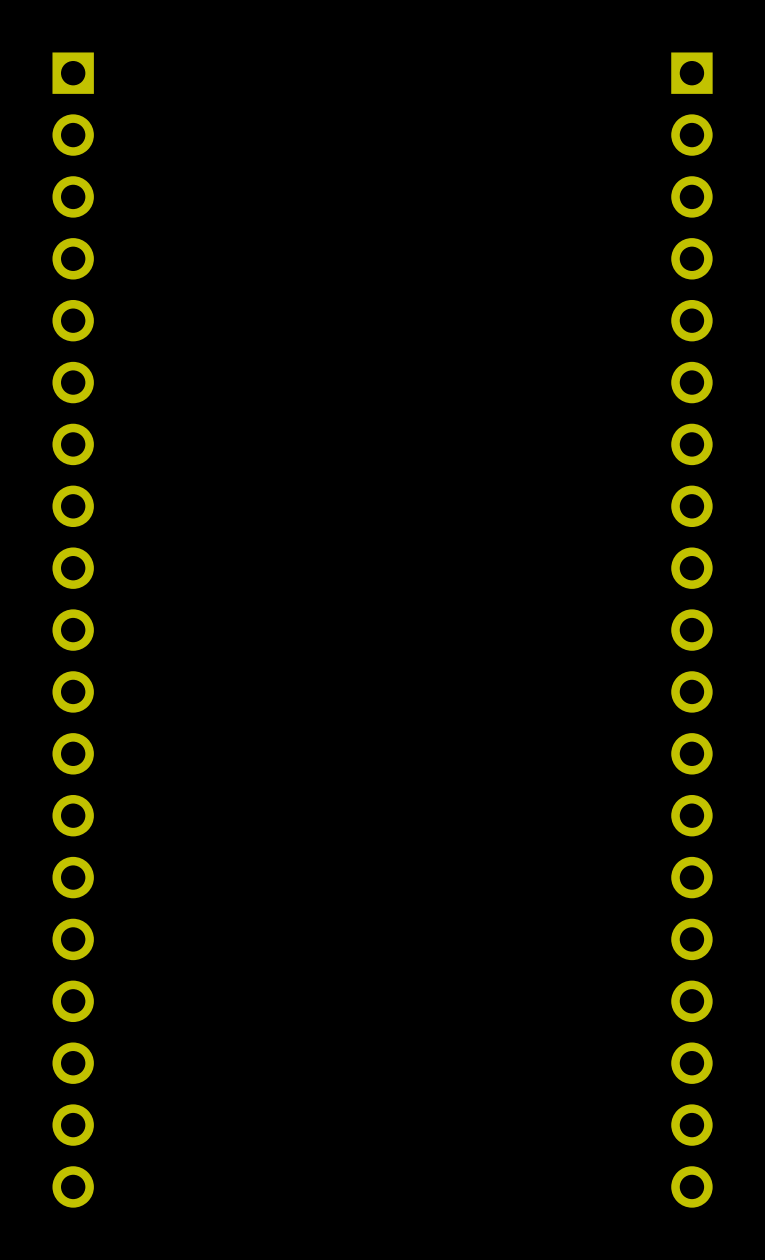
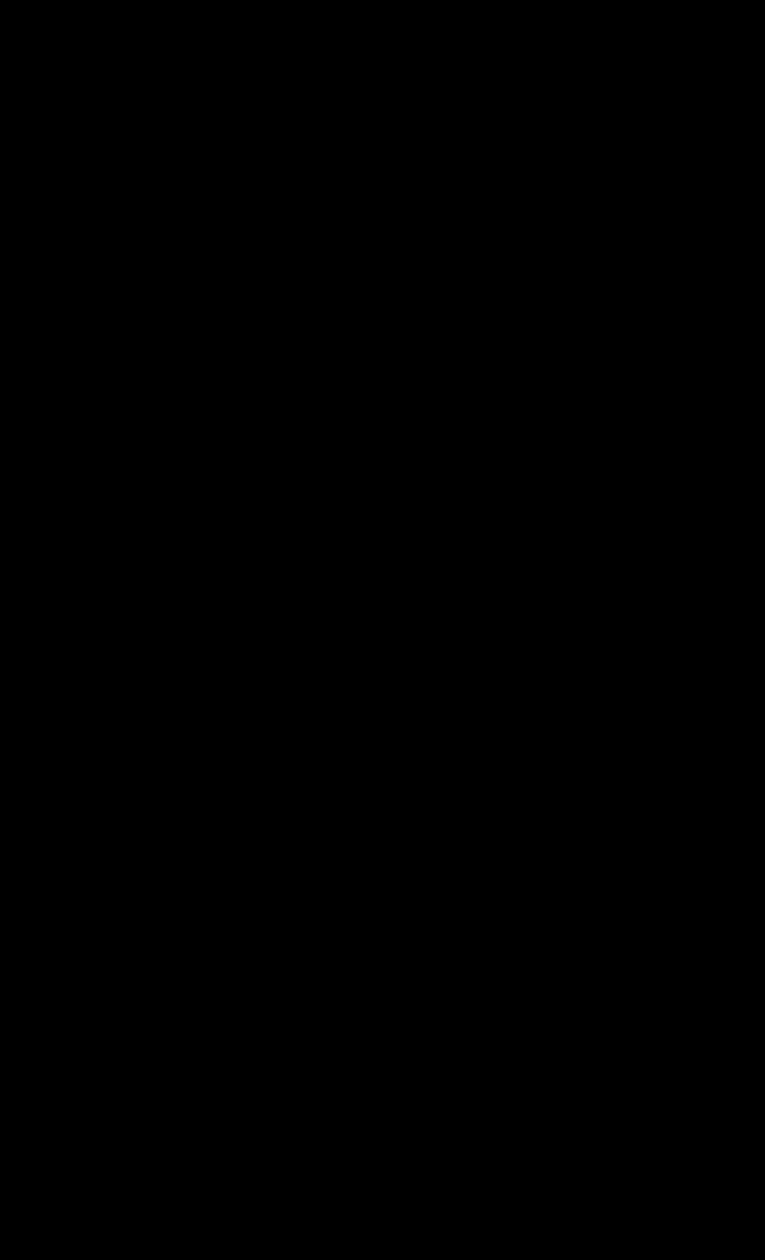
part: (73, 630) -> none
part: (691, 630) -> none

